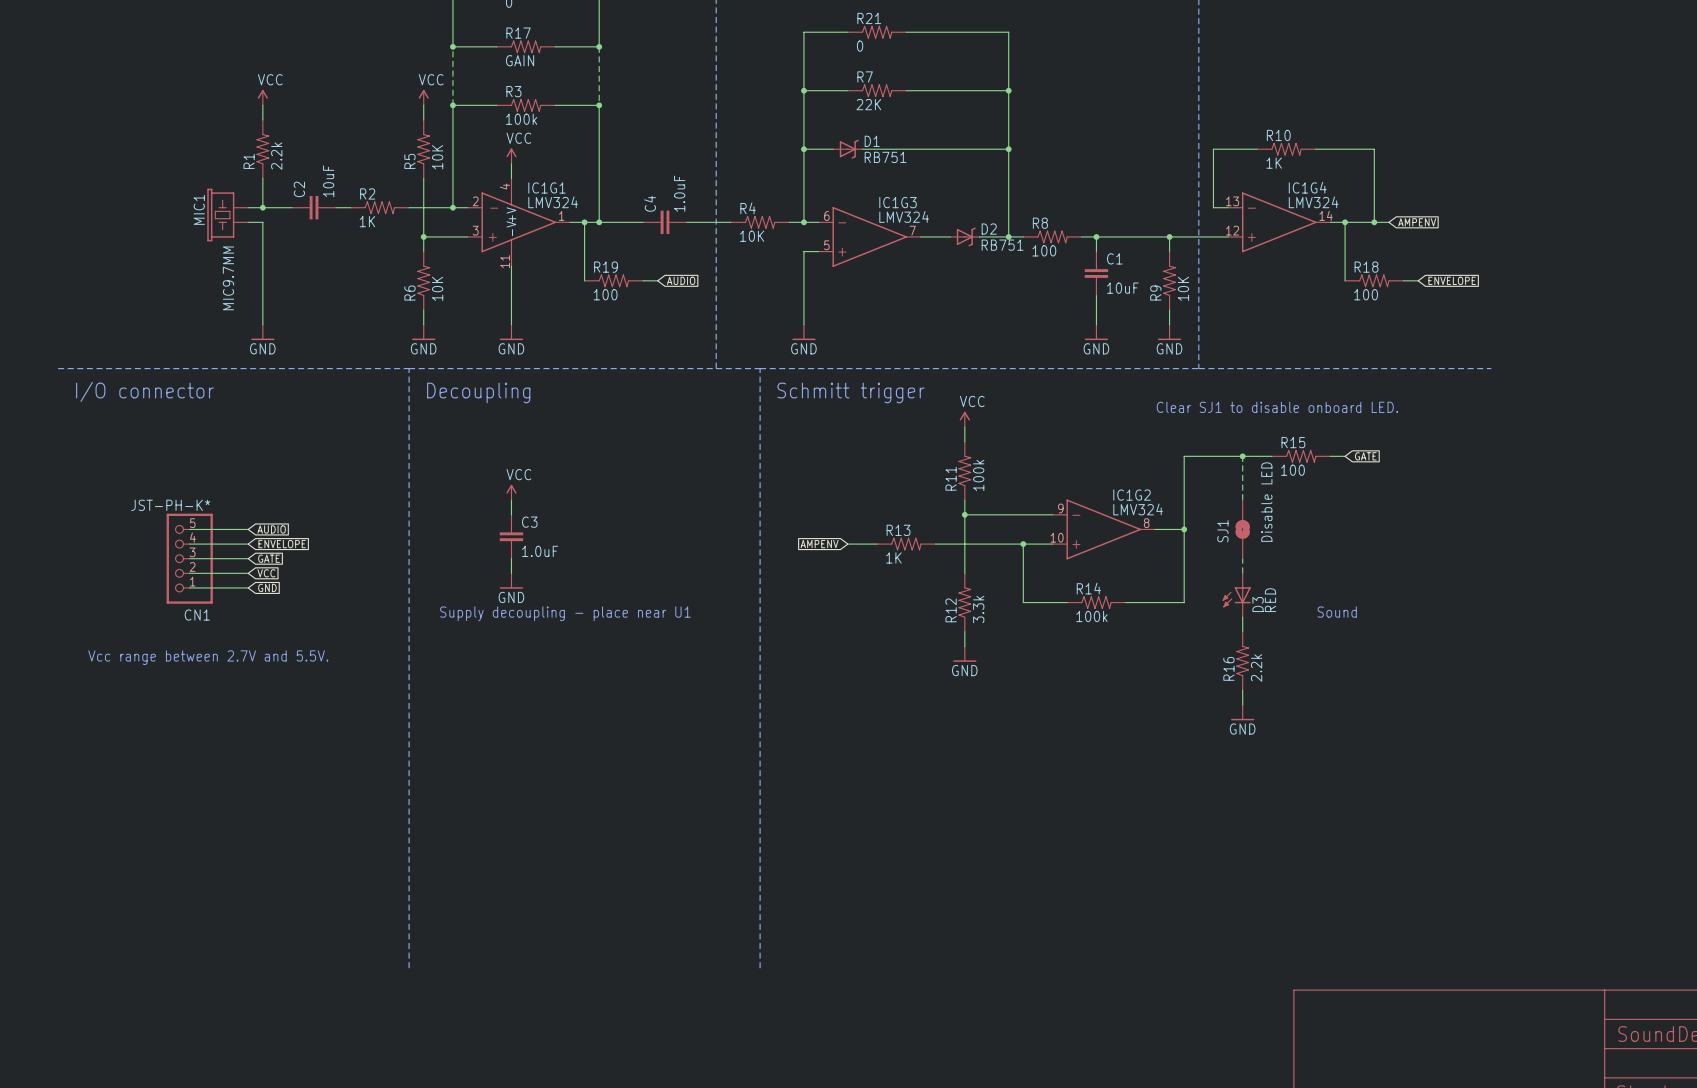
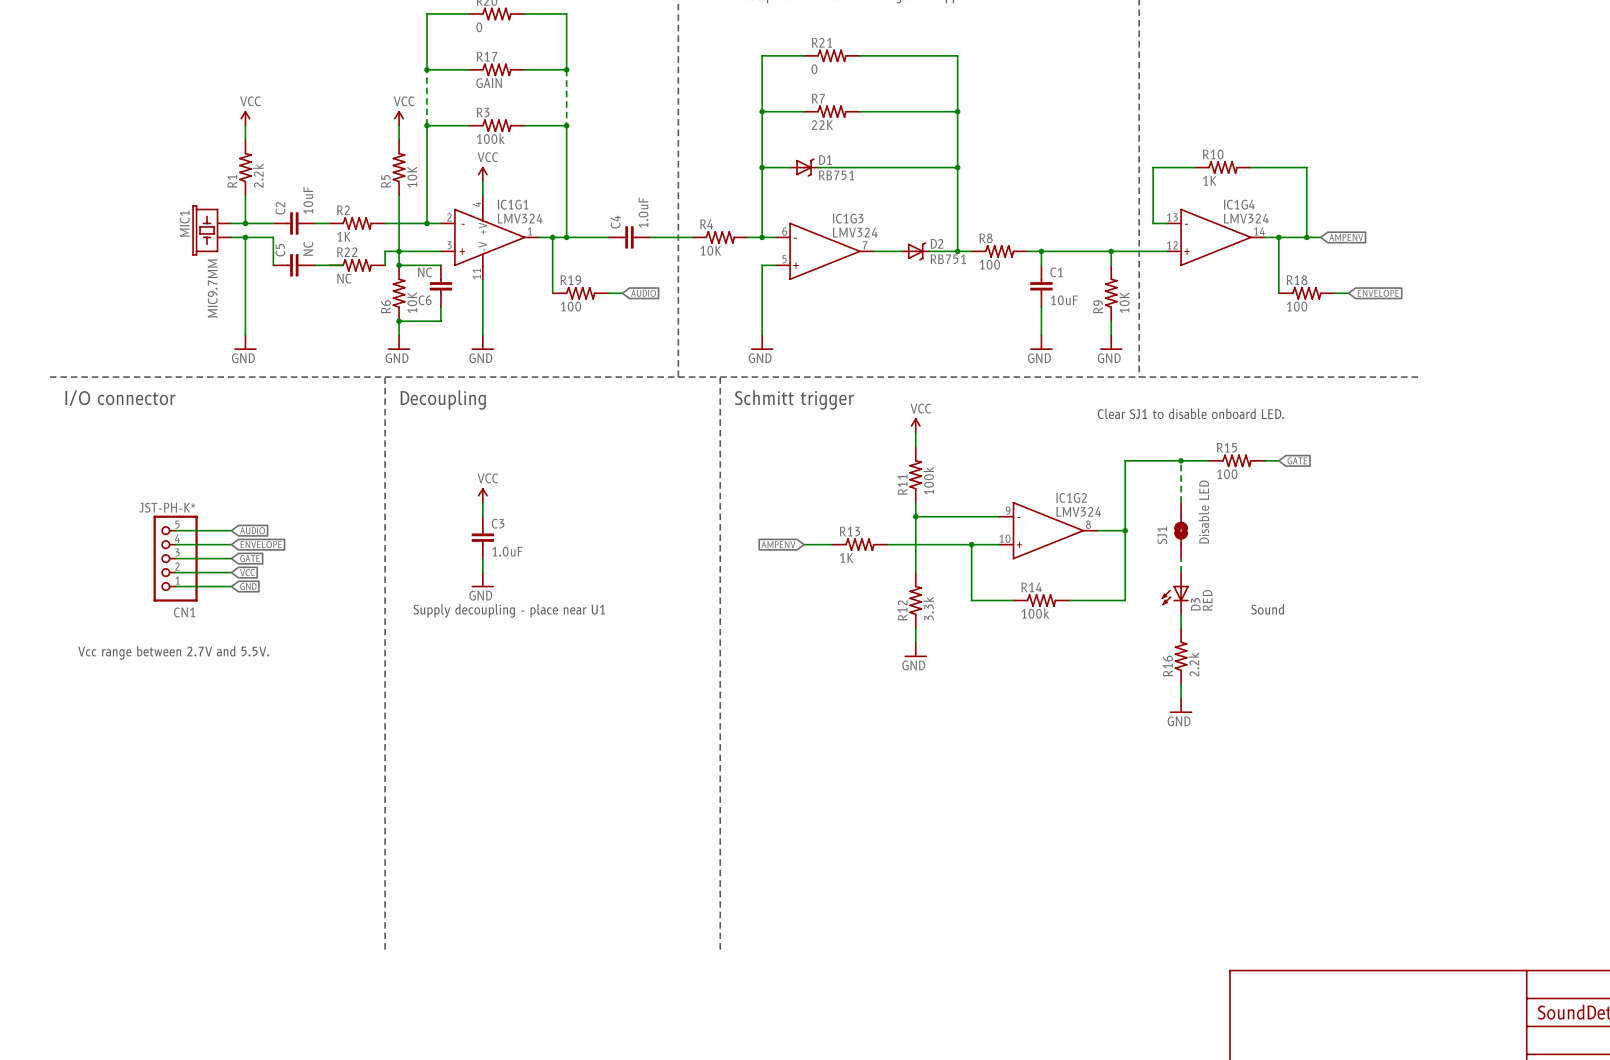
wire: none -> (245, 237) (273, 237) (273, 265)
junction: none -> (245, 237)
wire: none -> (399, 251) (385, 251) (385, 265)
C5: none -> NC (294, 265)
wire: none -> (315, 265) (343, 265)
R22: none -> NC (357, 265)
wire: none -> (399, 265) (440, 265)
junction: none -> (399, 265)
C6: none -> NC (440, 286)
wire: none -> (440, 307) (440, 321) (399, 321)
junction: none -> (399, 321)

